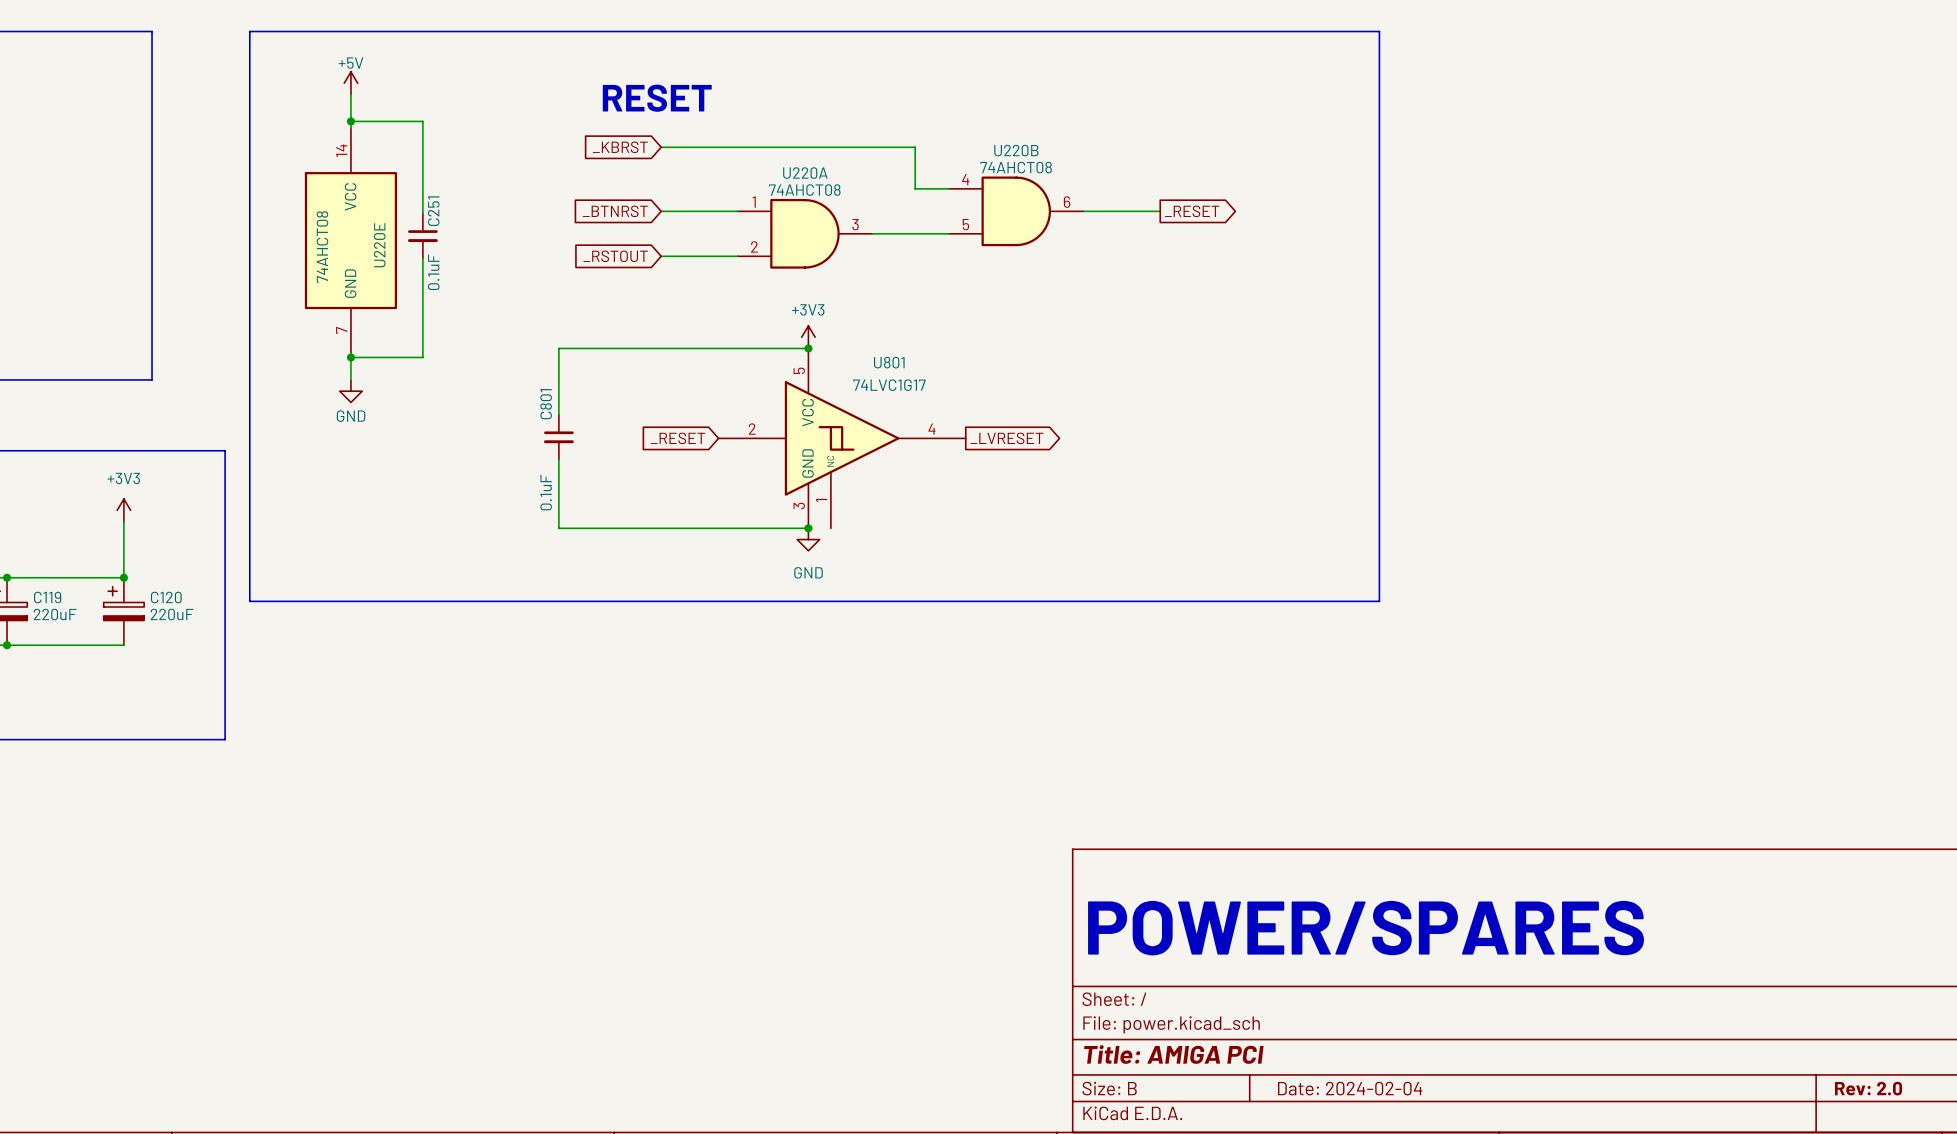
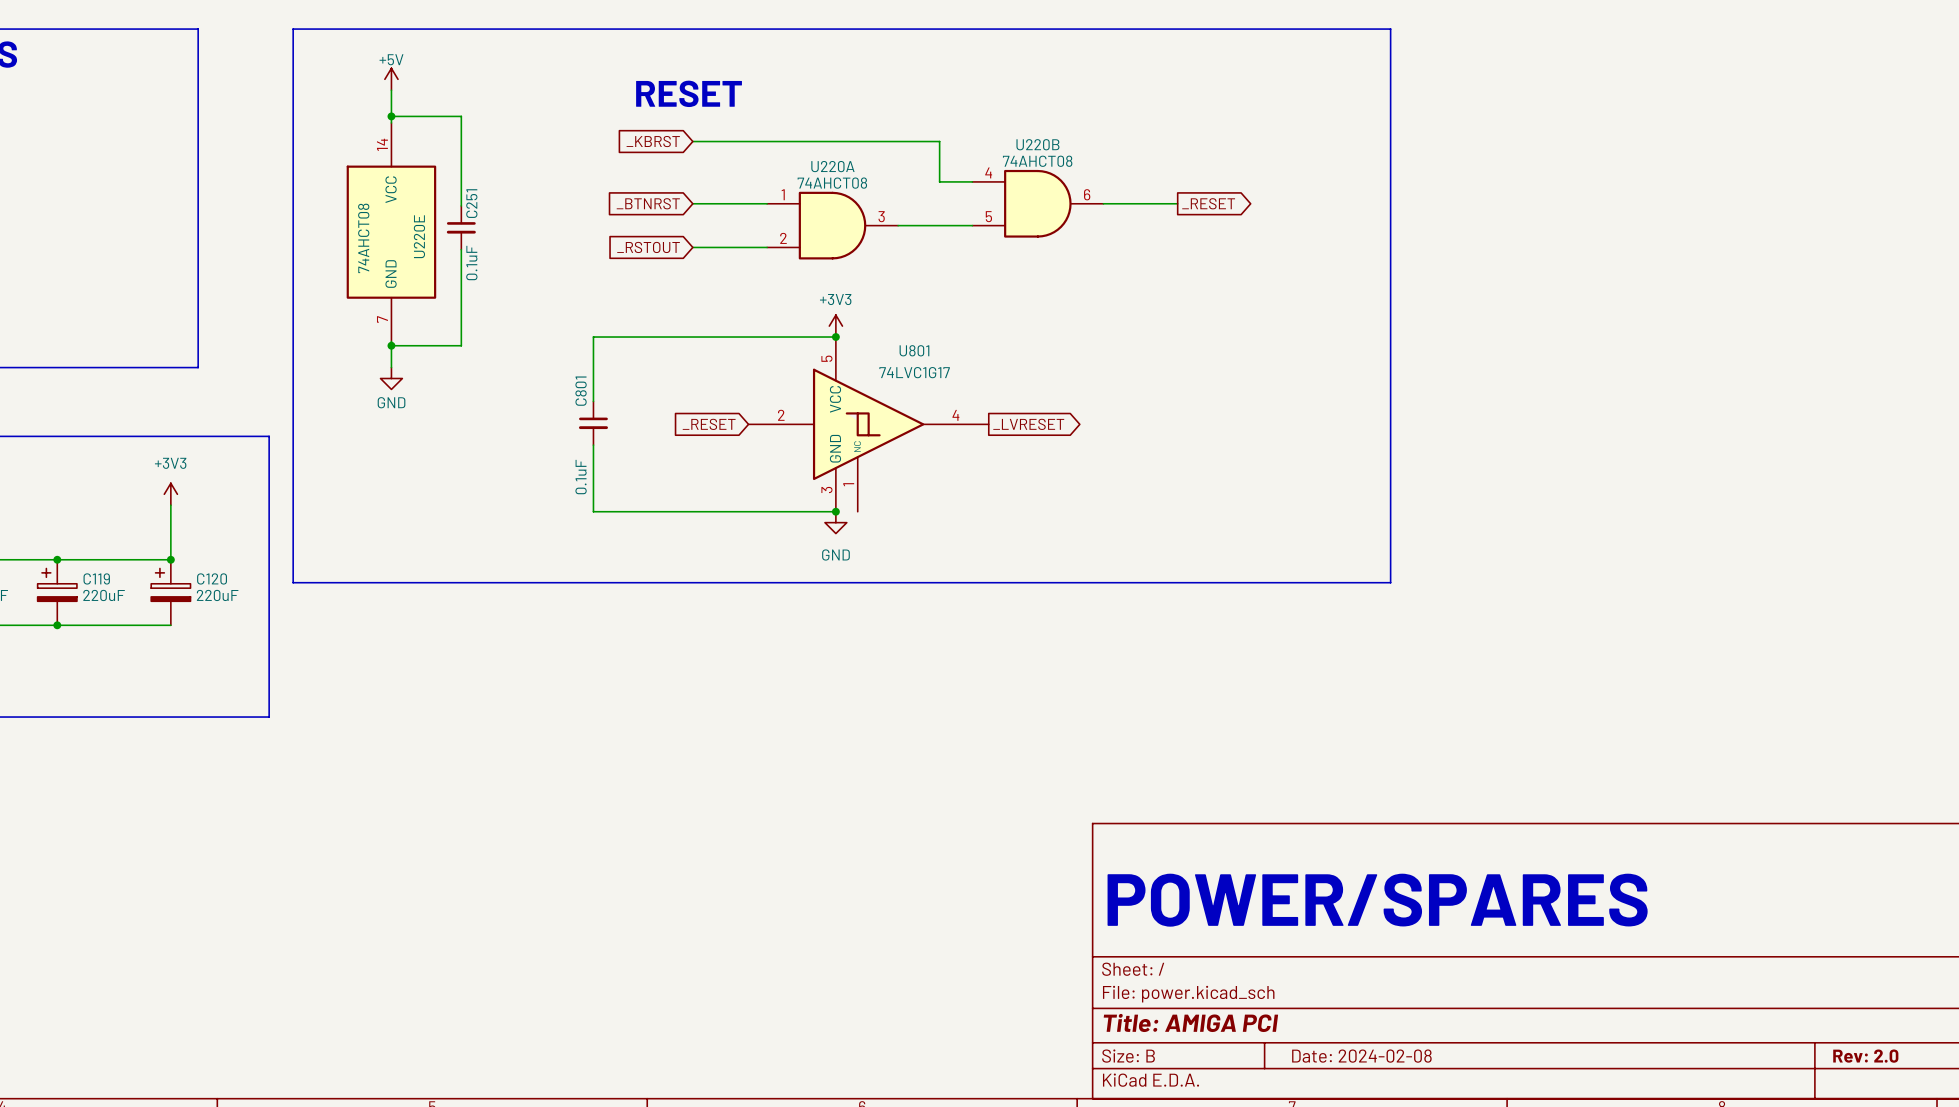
title block: Date: 2024-02-04 (1350, 1088) -> Date: 2024-02-08 (1361, 1056)

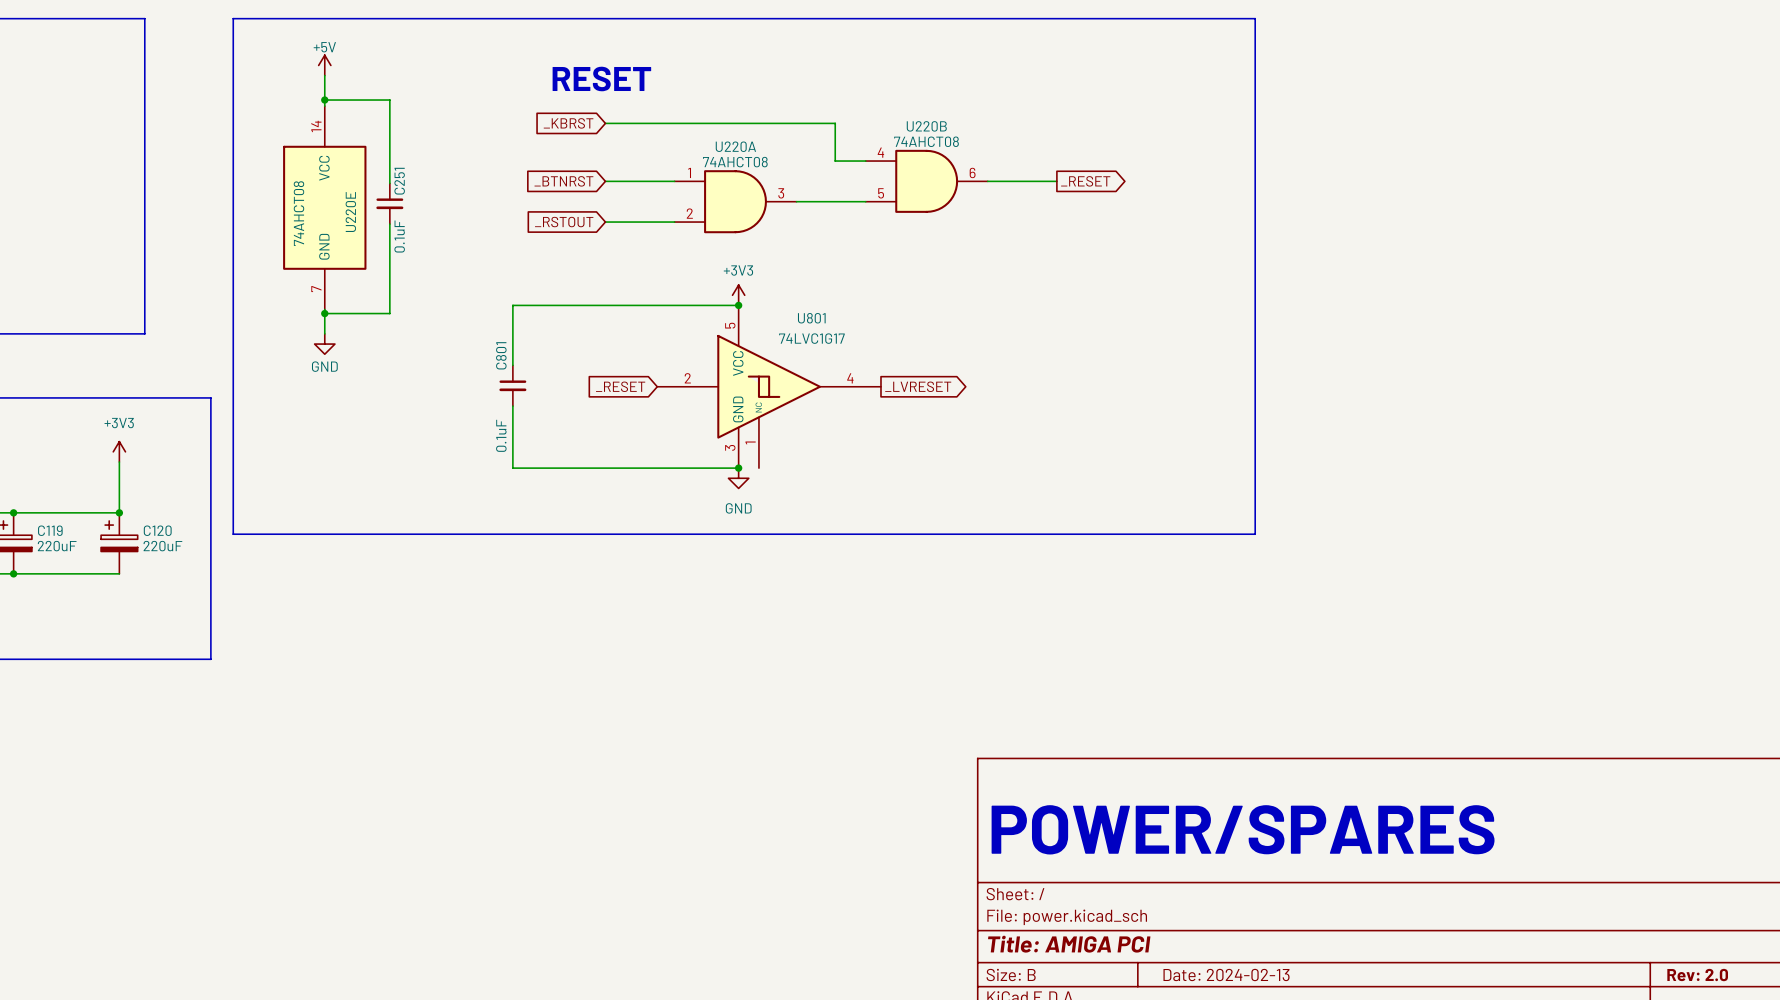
title block: Date: 2024-02-08 (1361, 1056) -> Date: 2024-02-13 (1226, 975)

